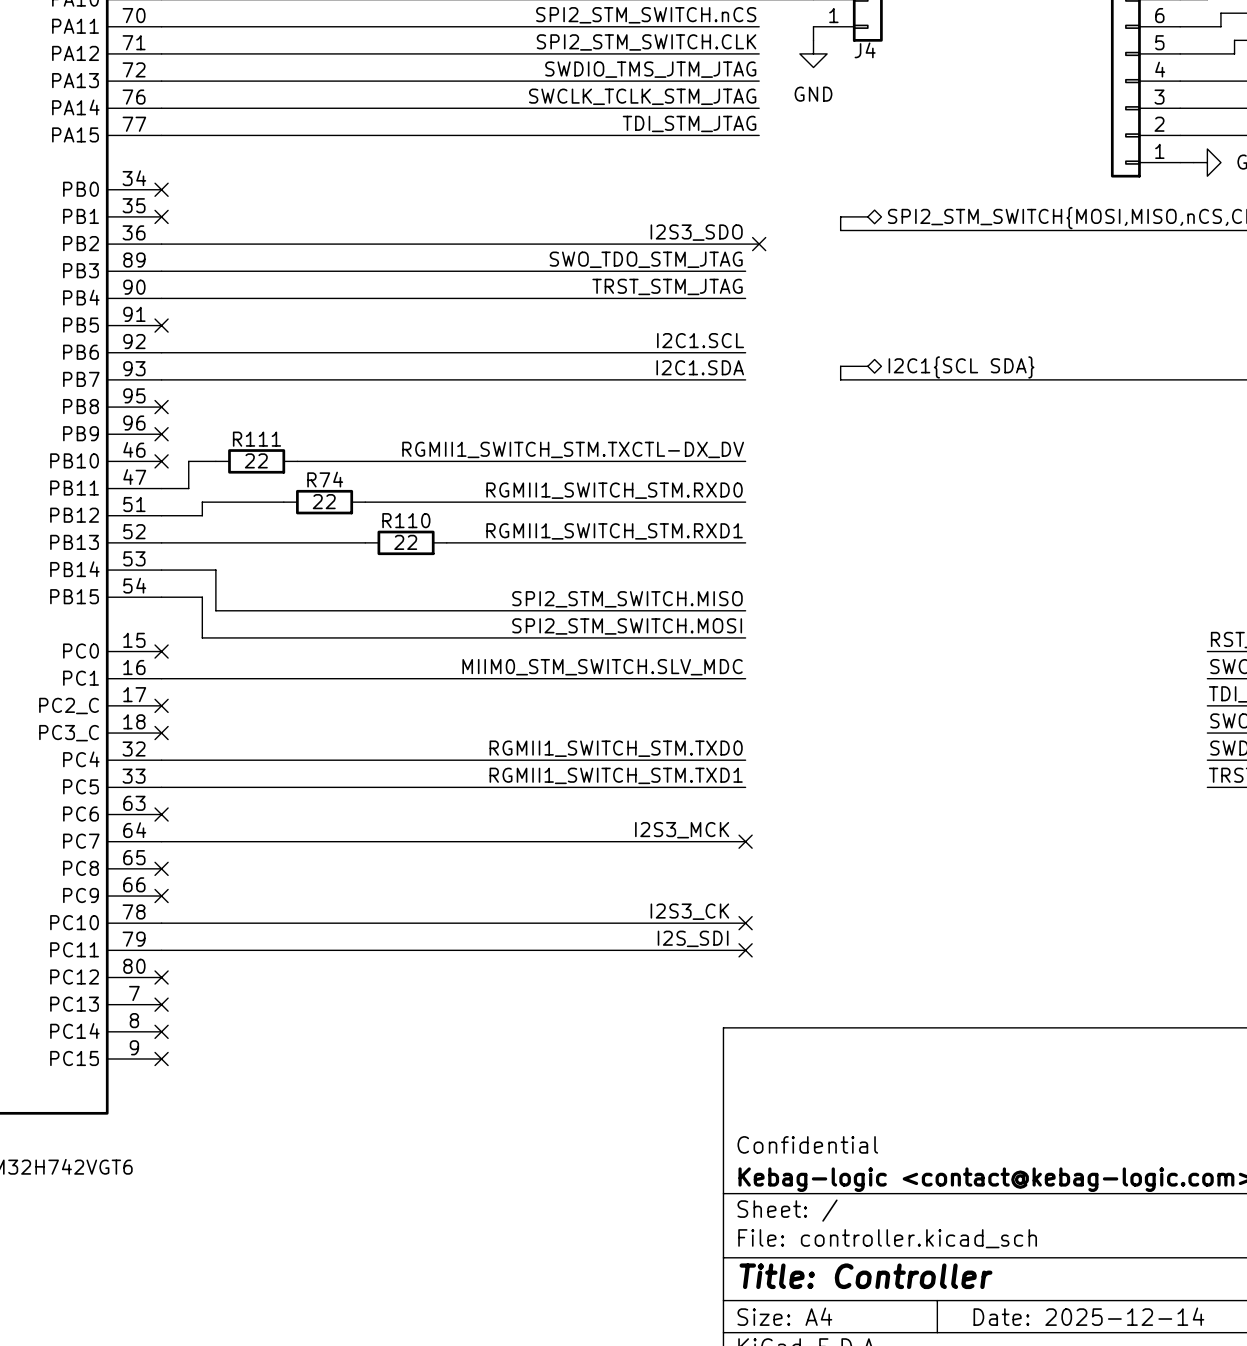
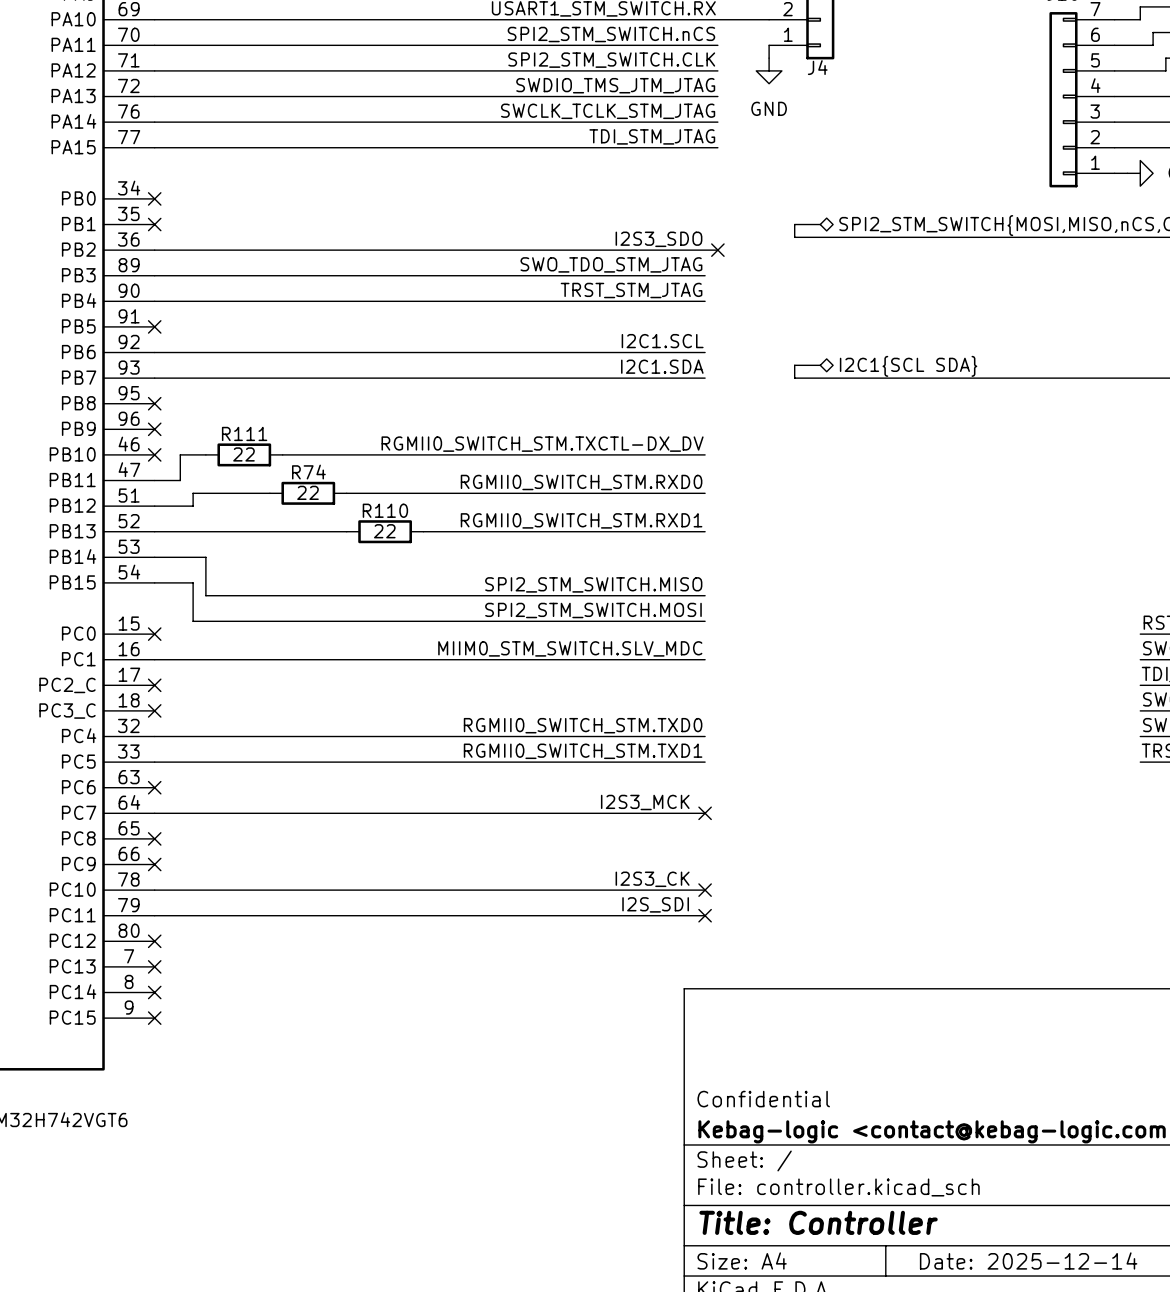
label: RGMII1_SWITCH_STM.TXCTL-DX_DV (573, 449) -> RGMII0_SWITCH_STM.TXCTL-DX_DV (542, 444)
label: RGMII1_SWITCH_STM.RXD0 (614, 490) -> RGMII0_SWITCH_STM.RXD0 (581, 482)
label: RGMII1_SWITCH_STM.RXD1 (614, 531) -> RGMII0_SWITCH_STM.RXD1 (581, 520)
label: RGMII1_SWITCH_STM.TXD0 (616, 748) -> RGMII0_SWITCH_STM.TXD0 (583, 725)
label: RGMII1_SWITCH_STM.TXD1 (616, 775) -> RGMII0_SWITCH_STM.TXD1 (583, 751)

